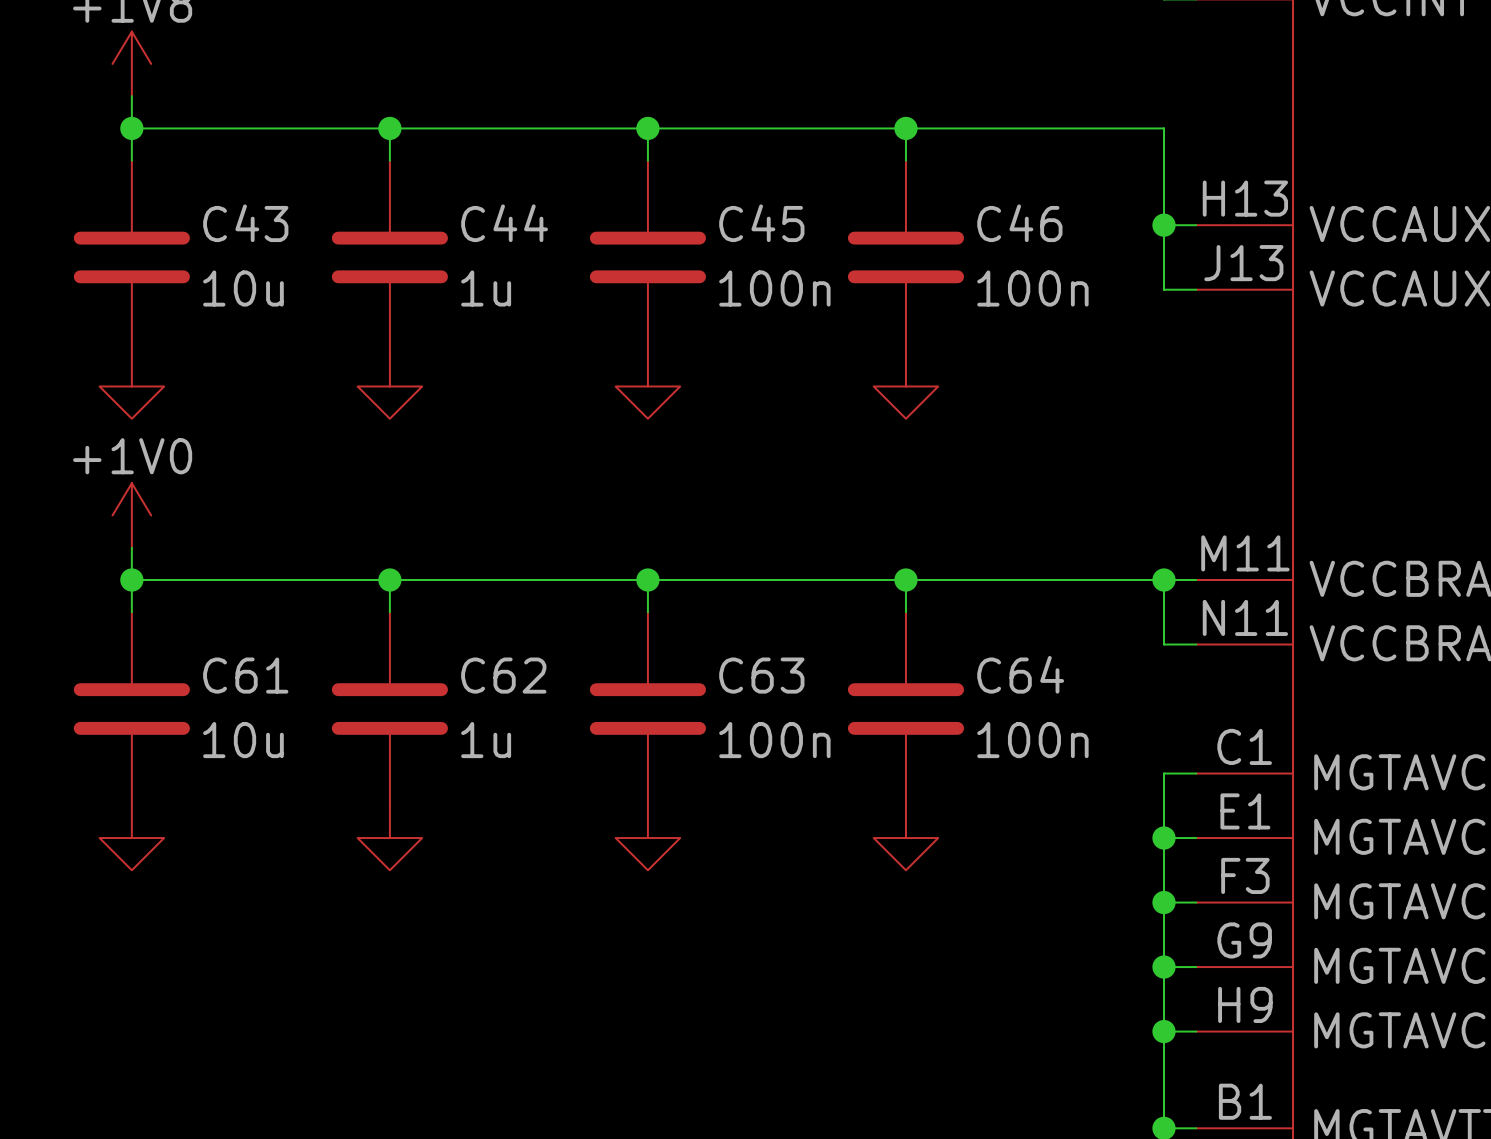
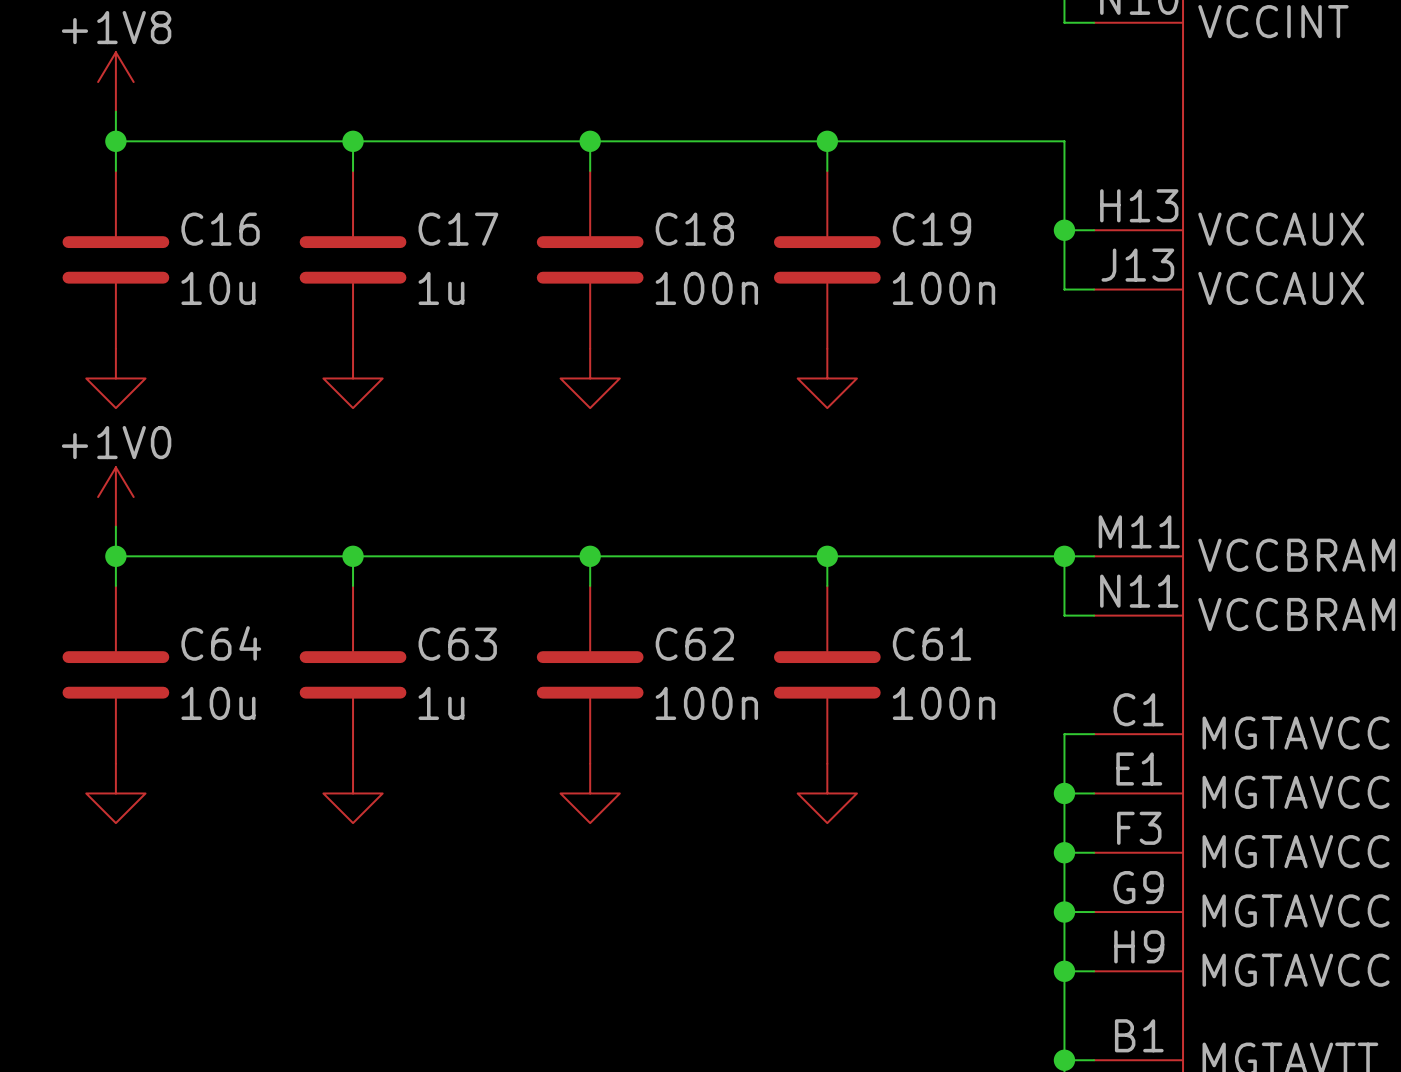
C43 name: C43 (245, 223) -> C16 (220, 229)
C44 name: C44 (504, 223) -> C17 (458, 229)
C45 name: C45 (761, 223) -> C18 (694, 229)
C46 name: C46 (1019, 223) -> C19 (932, 229)
C64 name: C64 (1020, 674) -> C61 (932, 644)
C61 name: C61 (245, 675) -> C64 (221, 643)
C62 name: C62 (503, 675) -> C63 (457, 644)
C63 name: C63 (761, 675) -> C62 (694, 644)

